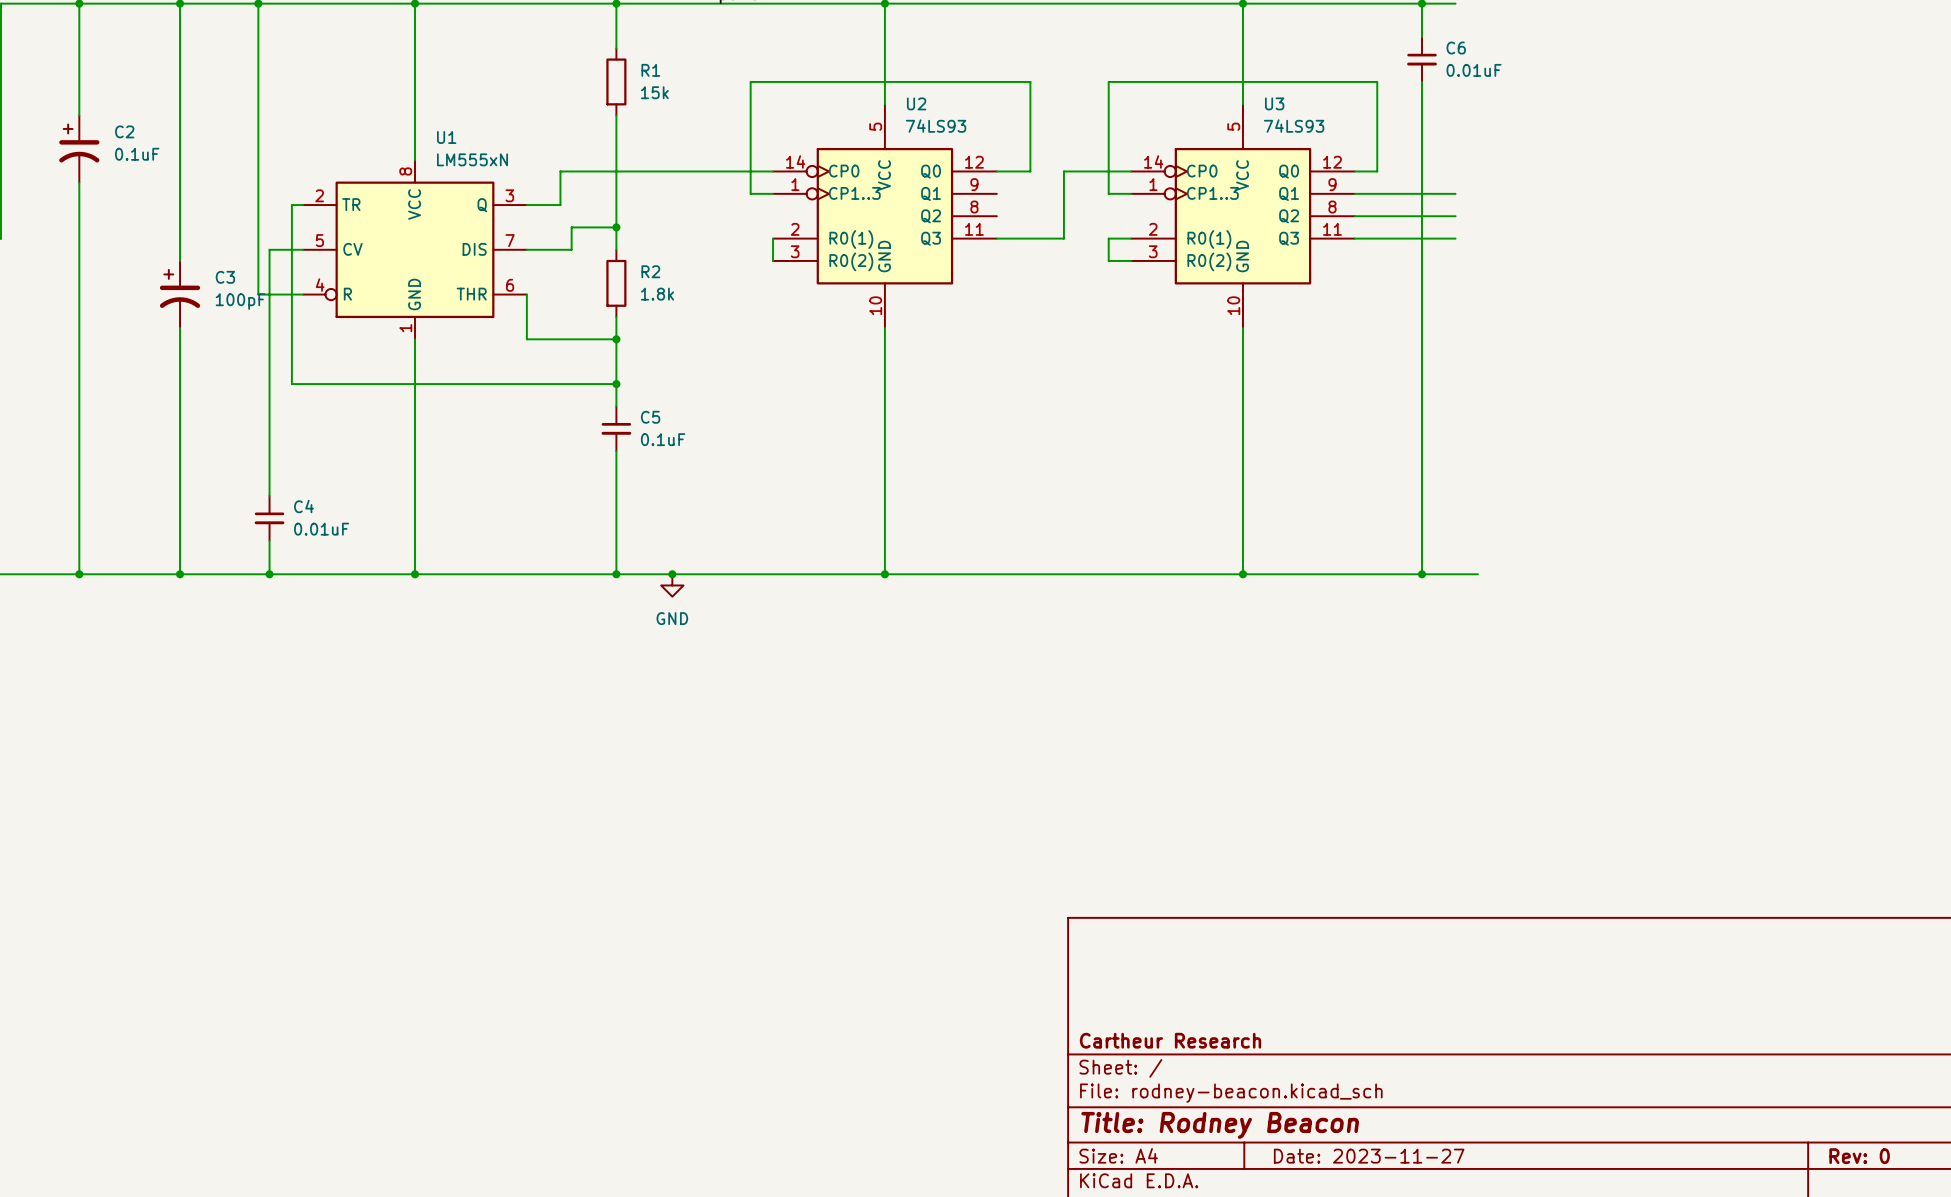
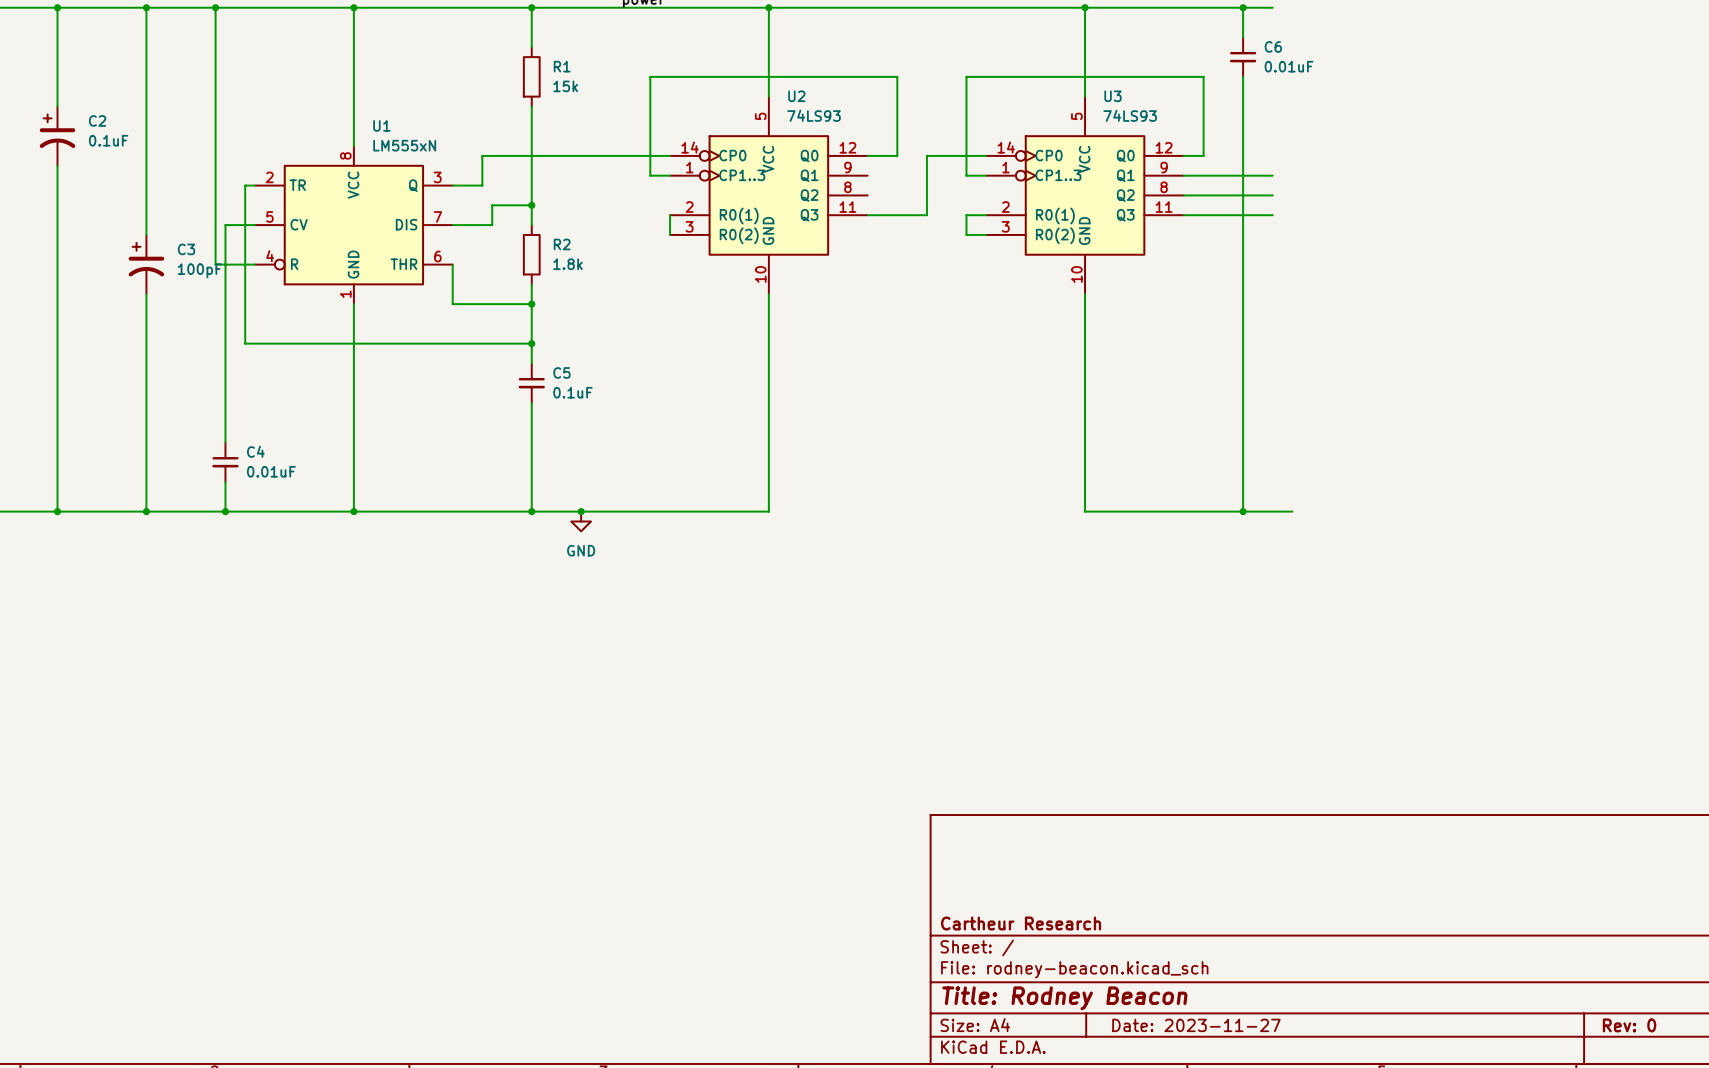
wire: (884, 574) (1242, 574) -> none
junction: (884, 574) -> none
junction: (1242, 574) -> none

